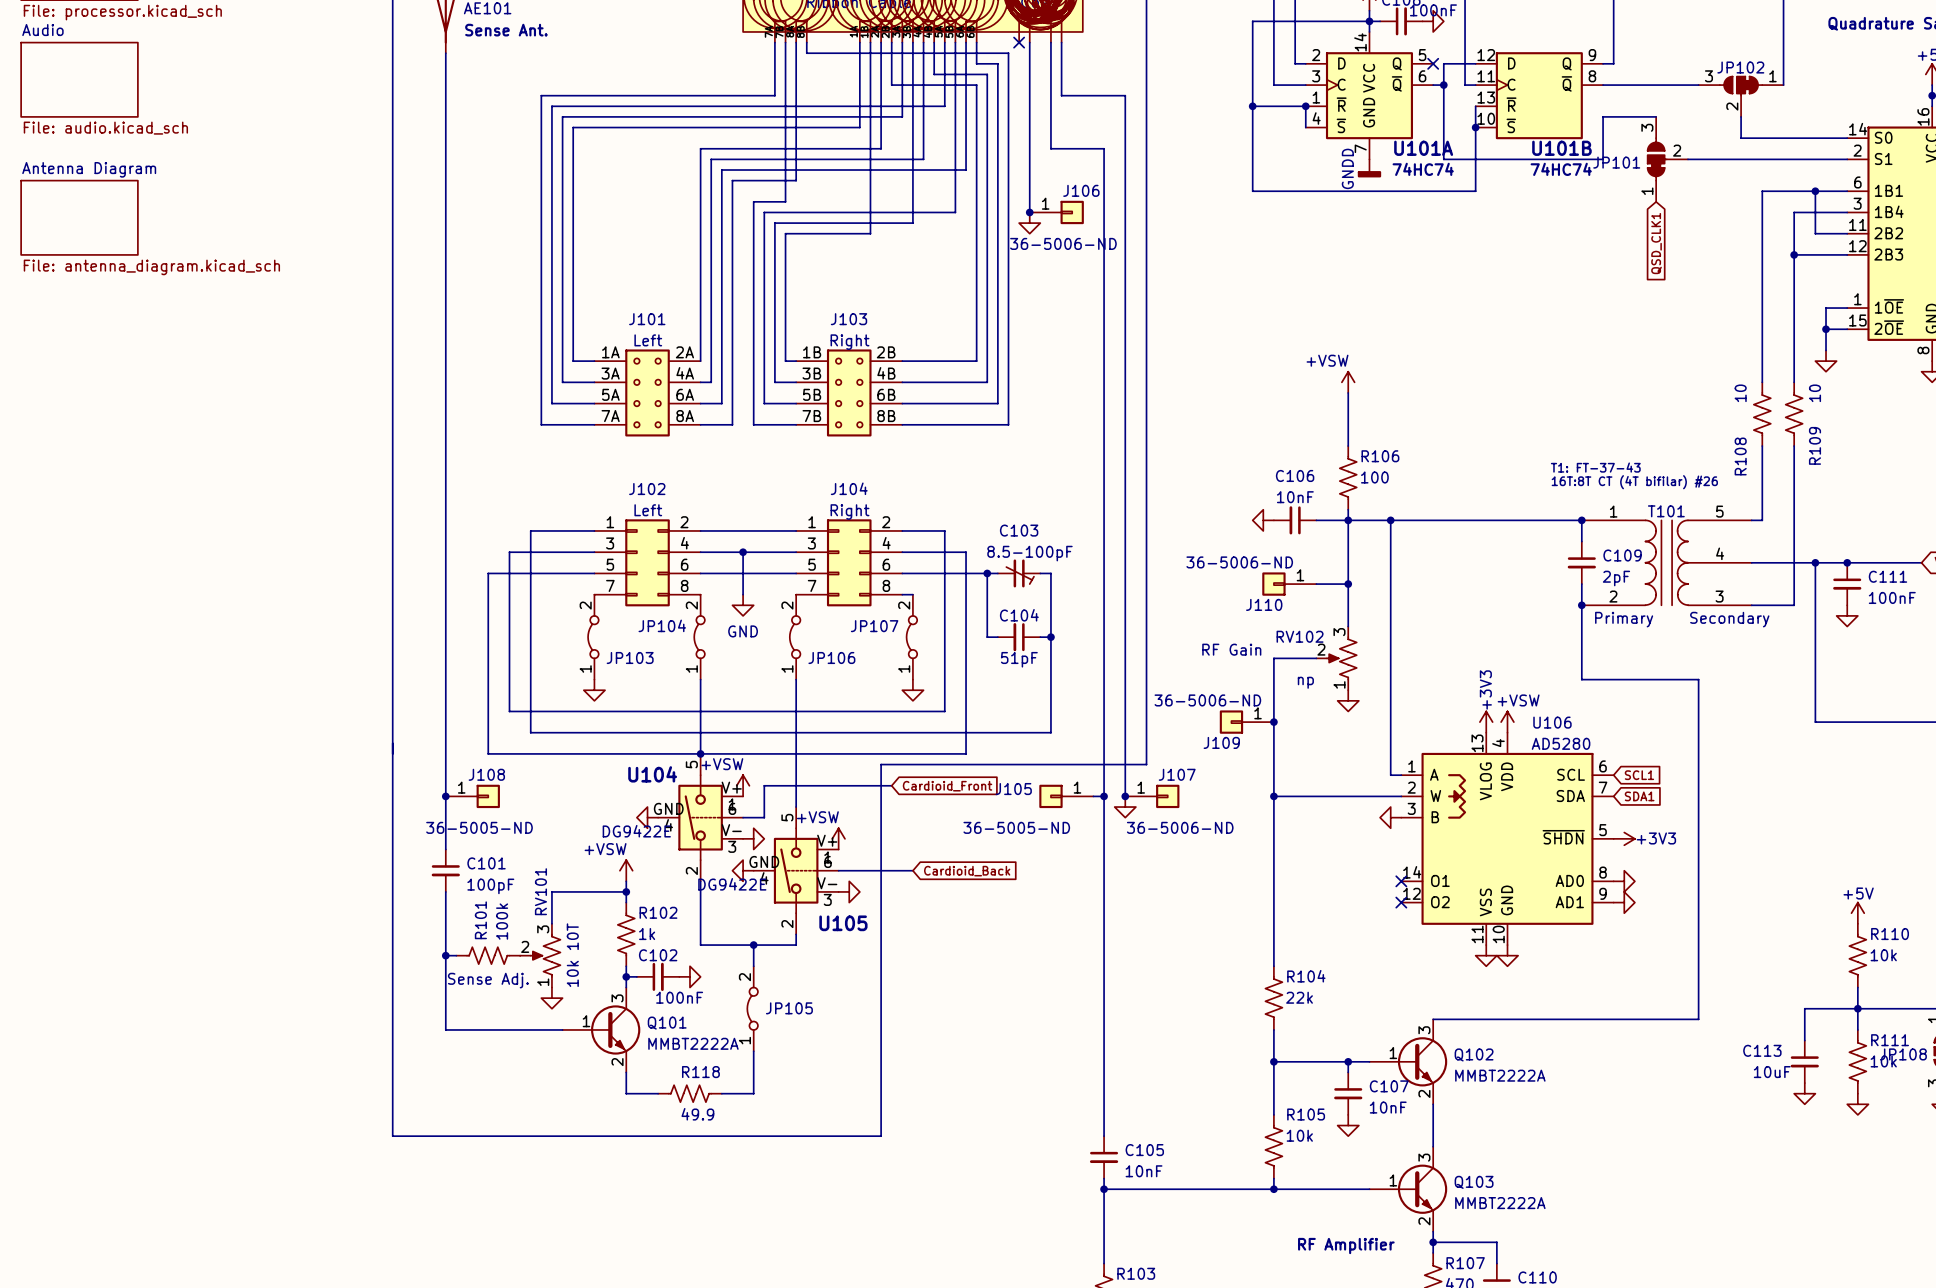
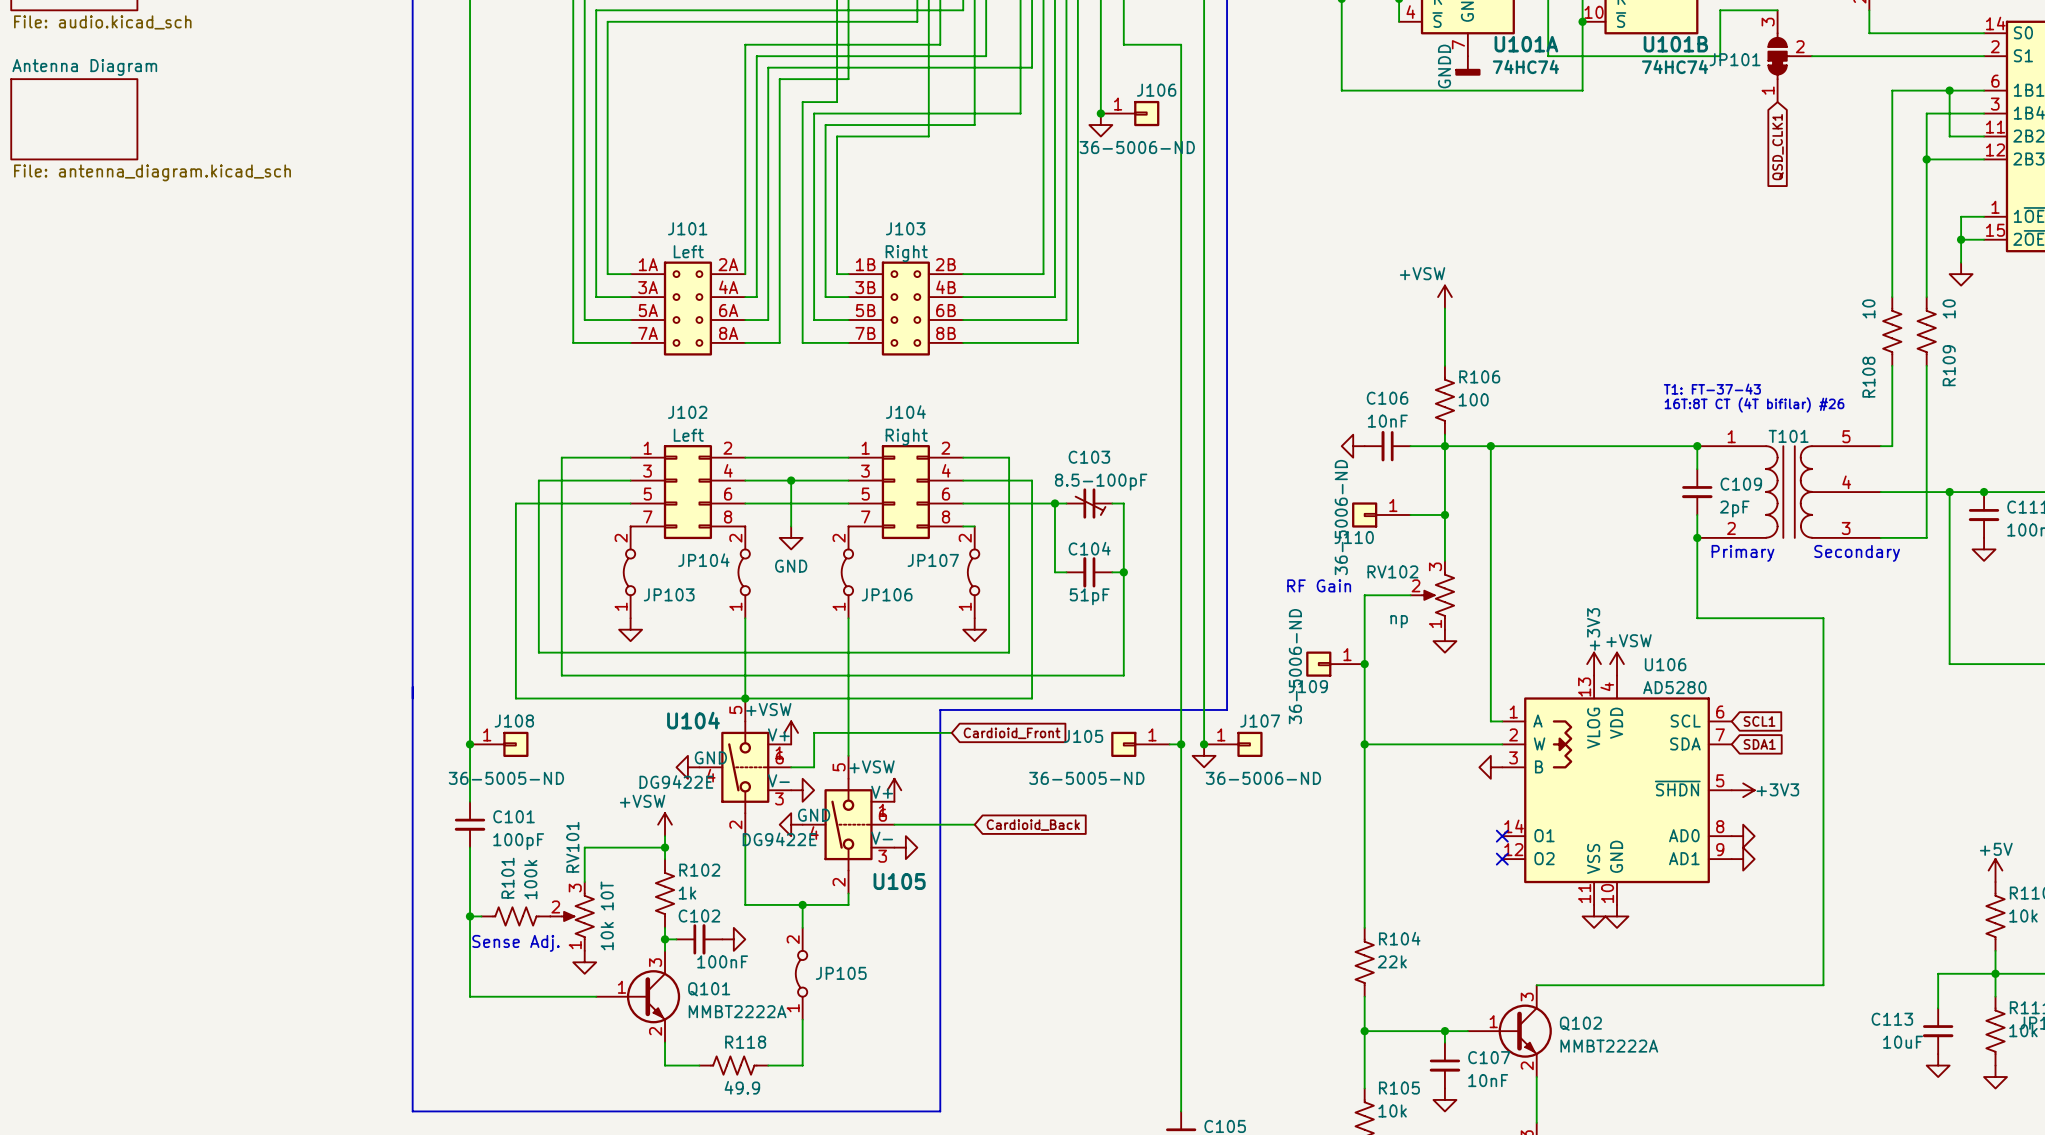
J110 value rotation: 0° (1239, 562) -> 90° counterclockwise (1341, 517)
J109 value rotation: 0° (1207, 700) -> 90° counterclockwise (1295, 666)

